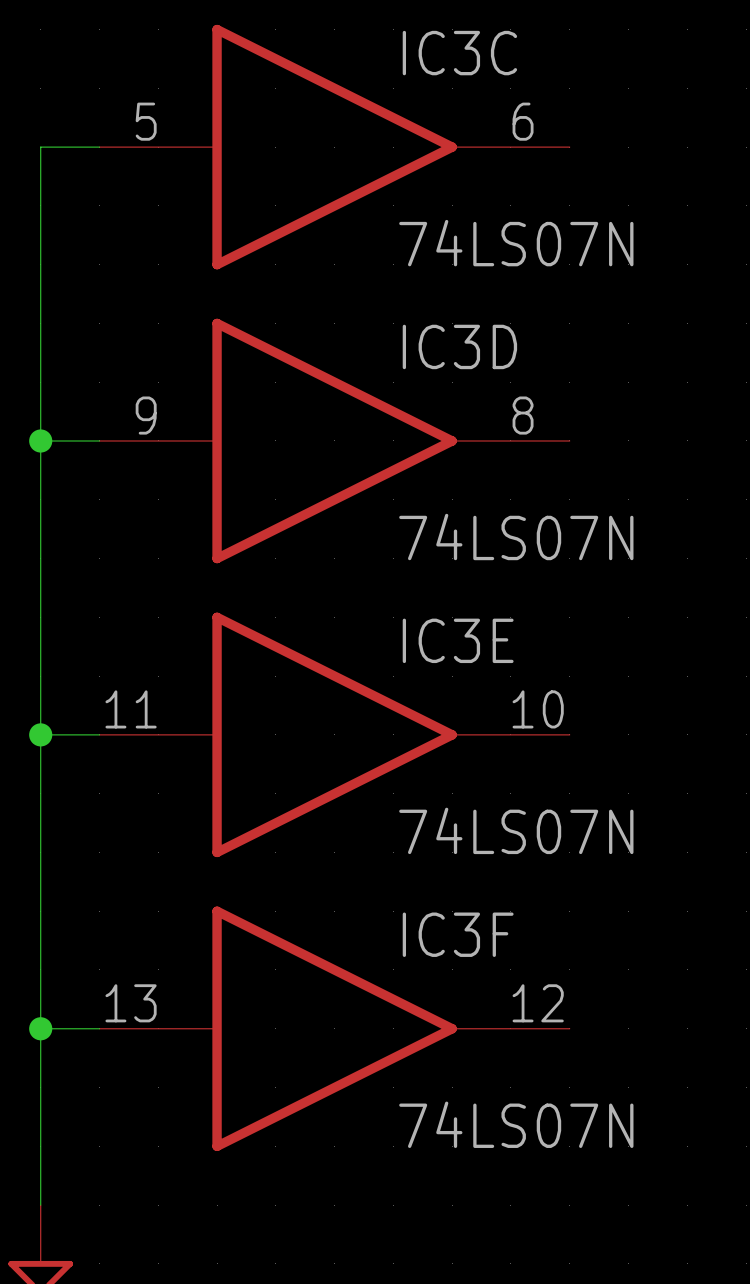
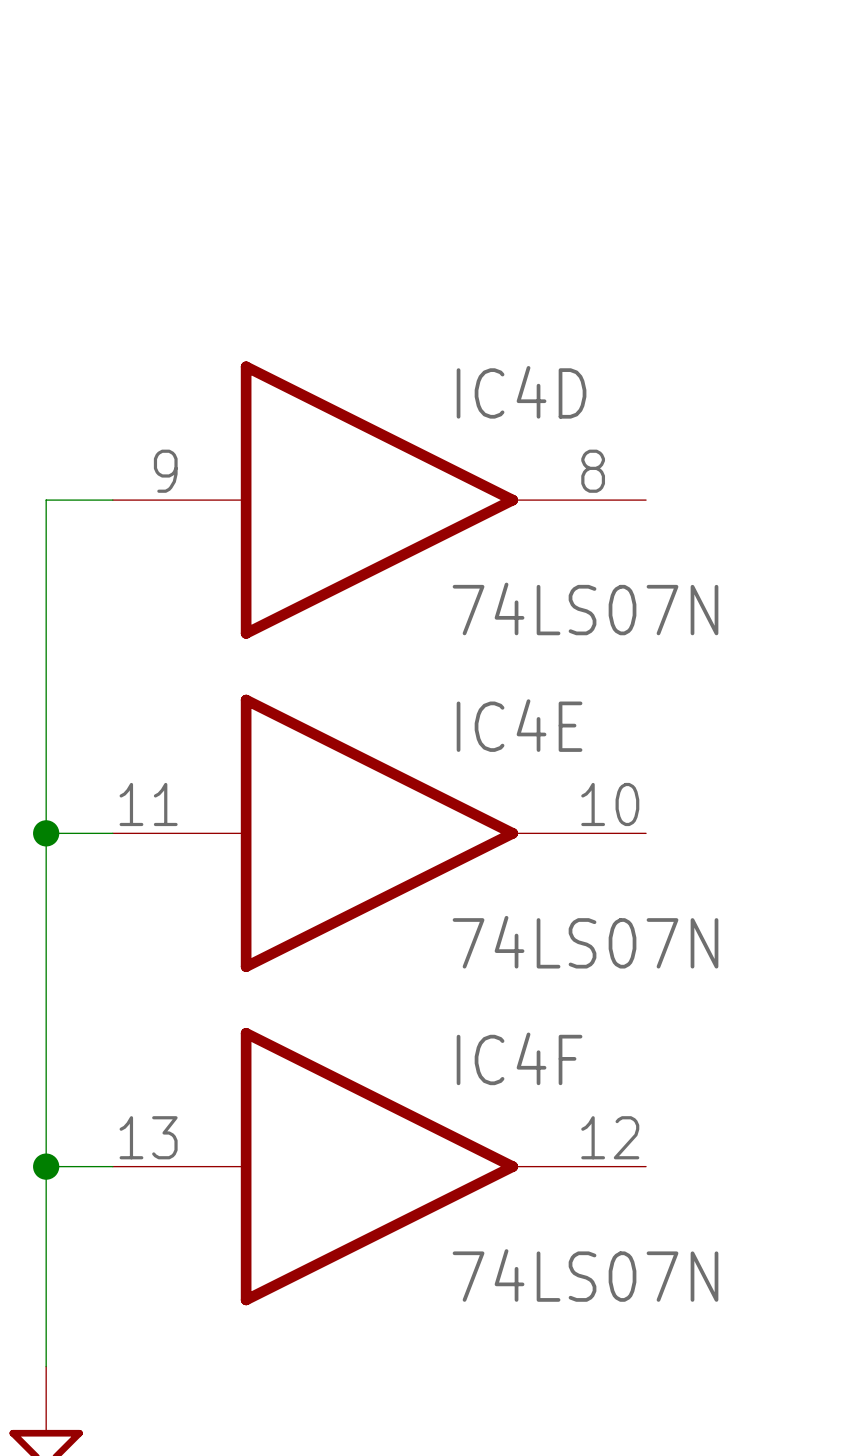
wire: (99, 147) (40, 147) (40, 440) -> none
IC3C: 74LS07N (334, 147) -> none
IC3D name: IC3D (459, 346) -> IC4D (521, 392)
junction: (40, 440) -> none
IC3E name: IC3E (458, 640) -> IC4E (519, 725)
IC3F name: IC3F (458, 934) -> IC4F (519, 1058)

